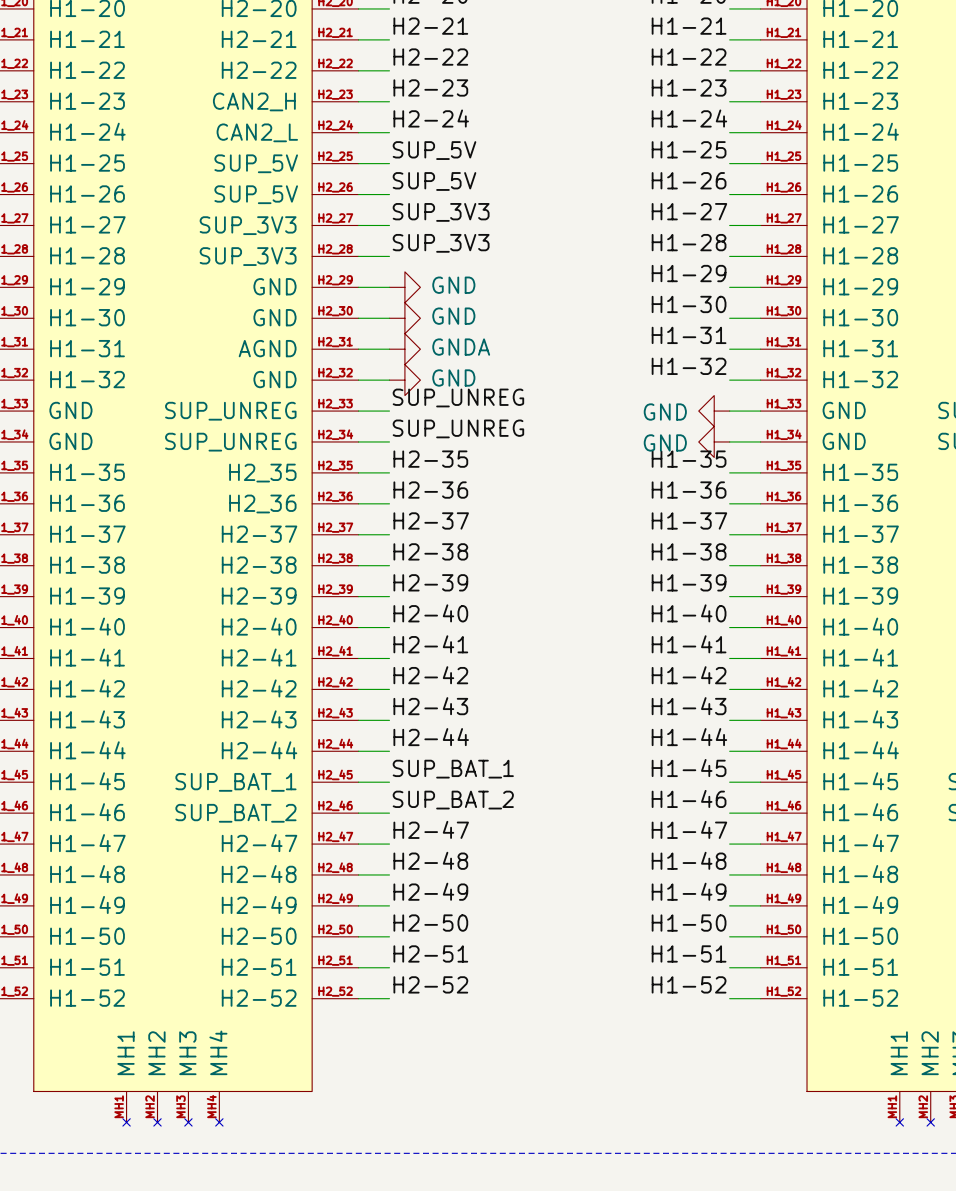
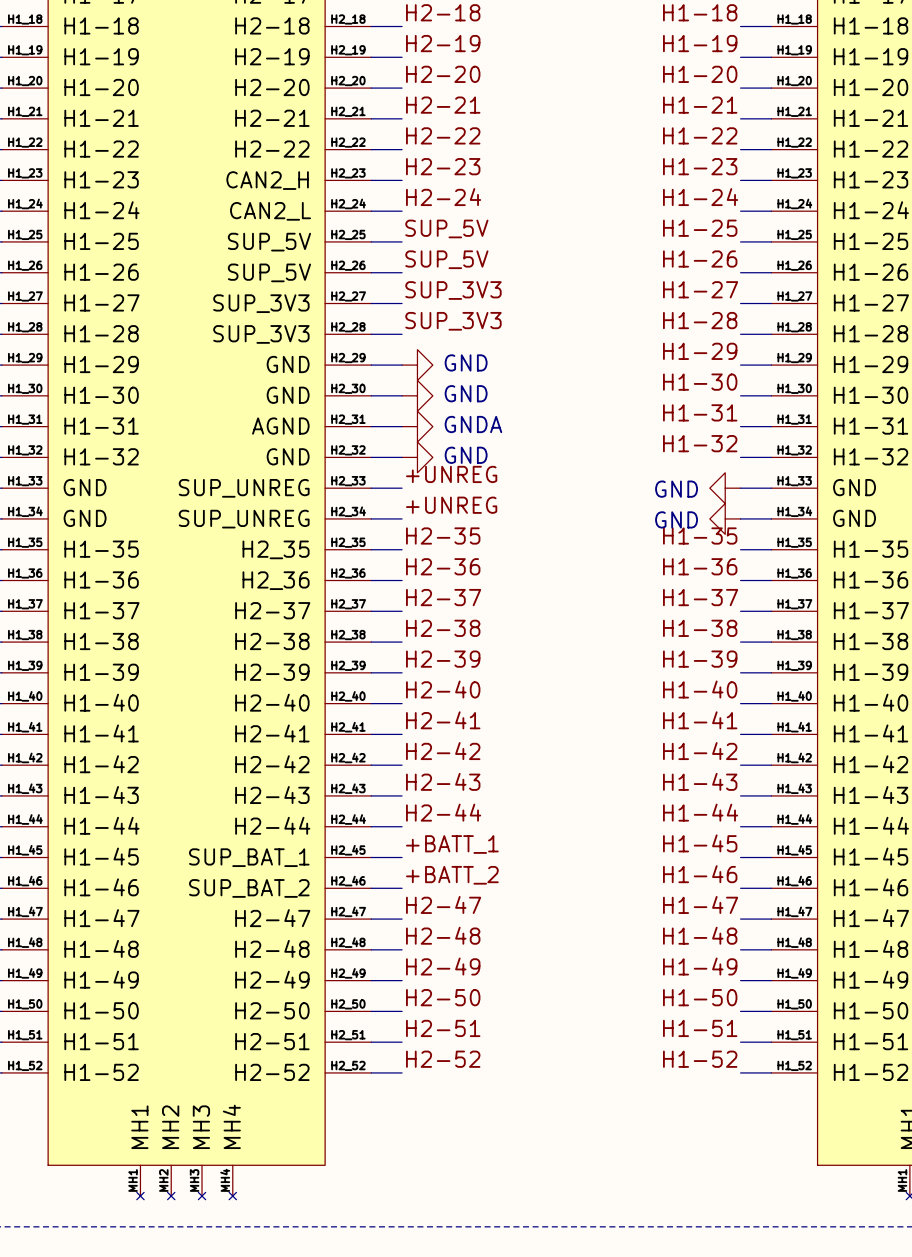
label: SUP_UNREG (458, 397) -> +UNREG (451, 474)
label: SUP_UNREG (458, 428) -> +UNREG (451, 505)
label: SUP_BAT_1 (453, 769) -> +BATT_1 (452, 844)
label: SUP_BAT_2 (453, 800) -> +BATT_2 (452, 875)

